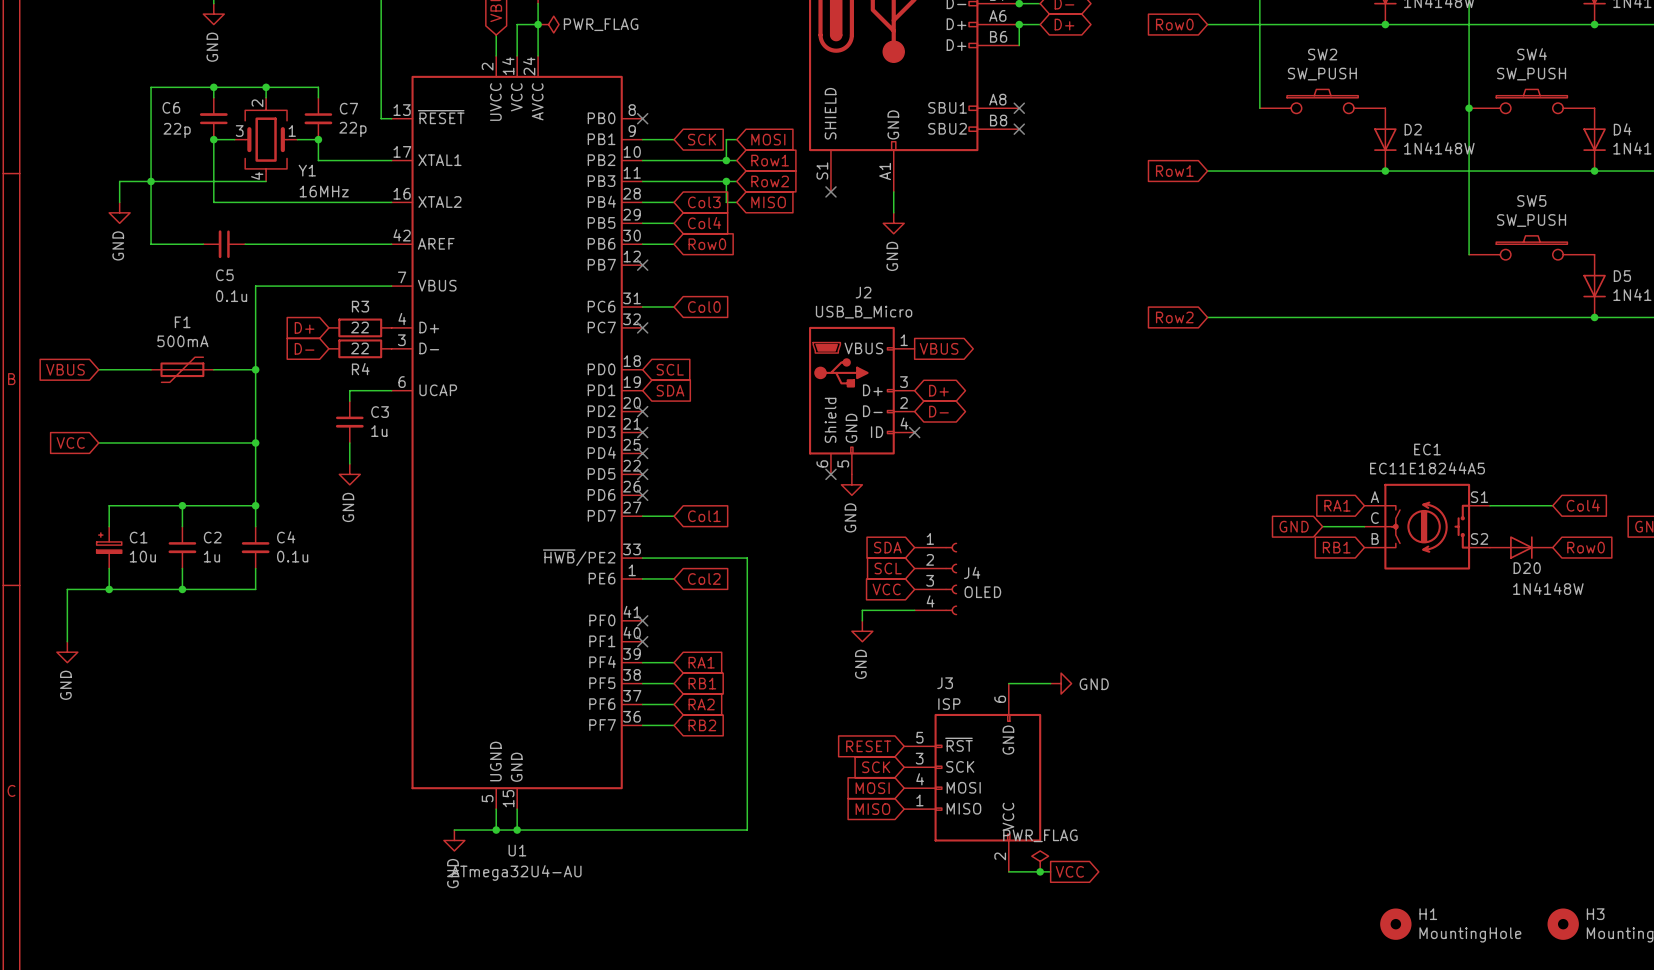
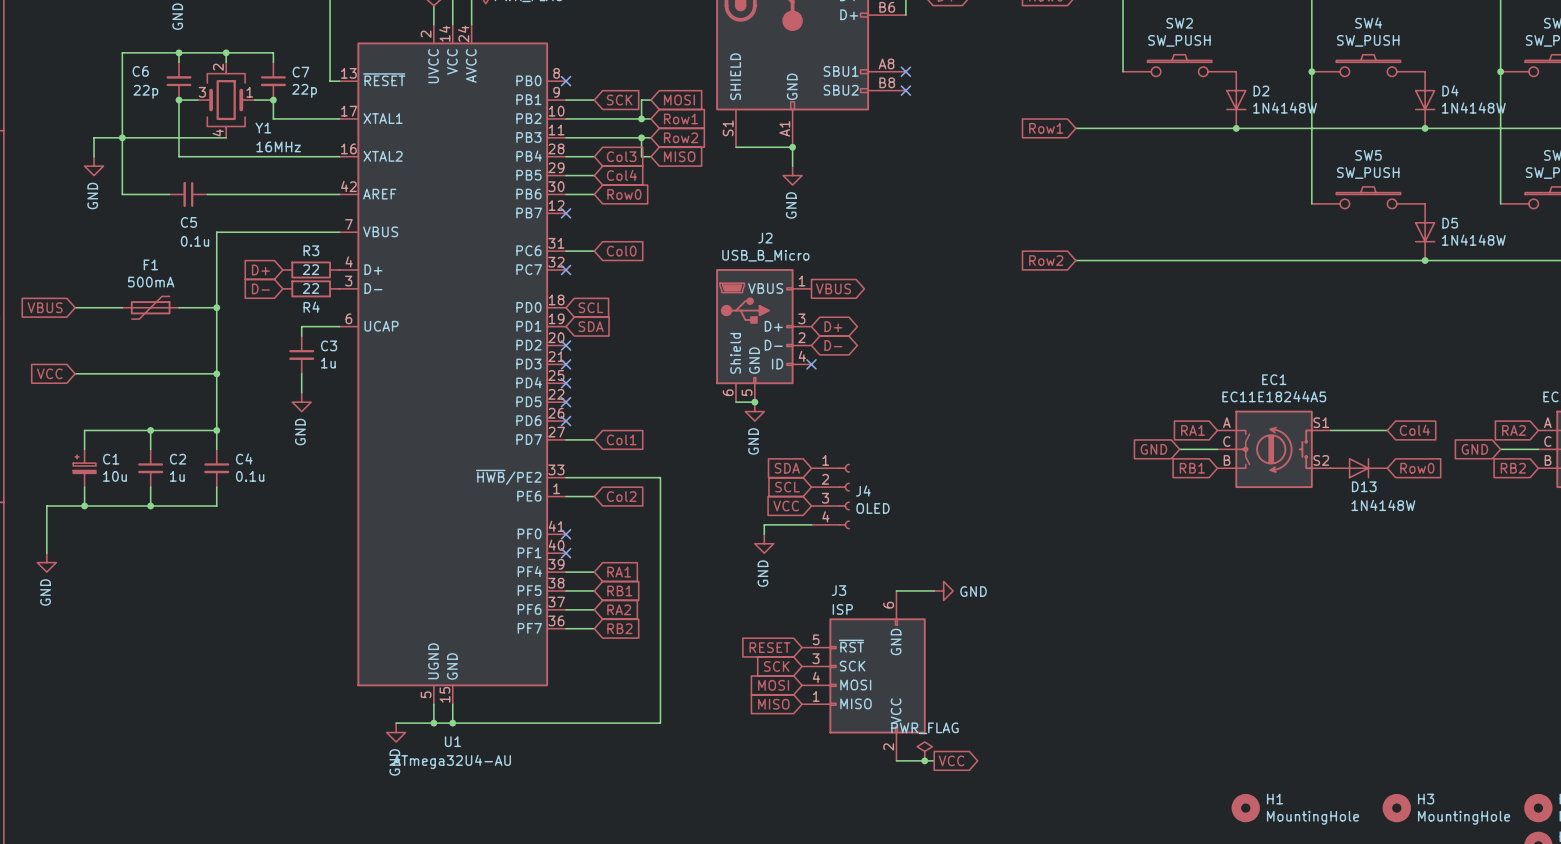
wire: none -> (735, 147) (792, 147)
no-connect mark: (830, 191) -> none
junction: none -> (792, 147)
wire: none -> (735, 402) (754, 402)
no-connect mark: (830, 474) -> none
junction: none -> (754, 402)
D20 name: D20 (1527, 568) -> D13 (1364, 486)

